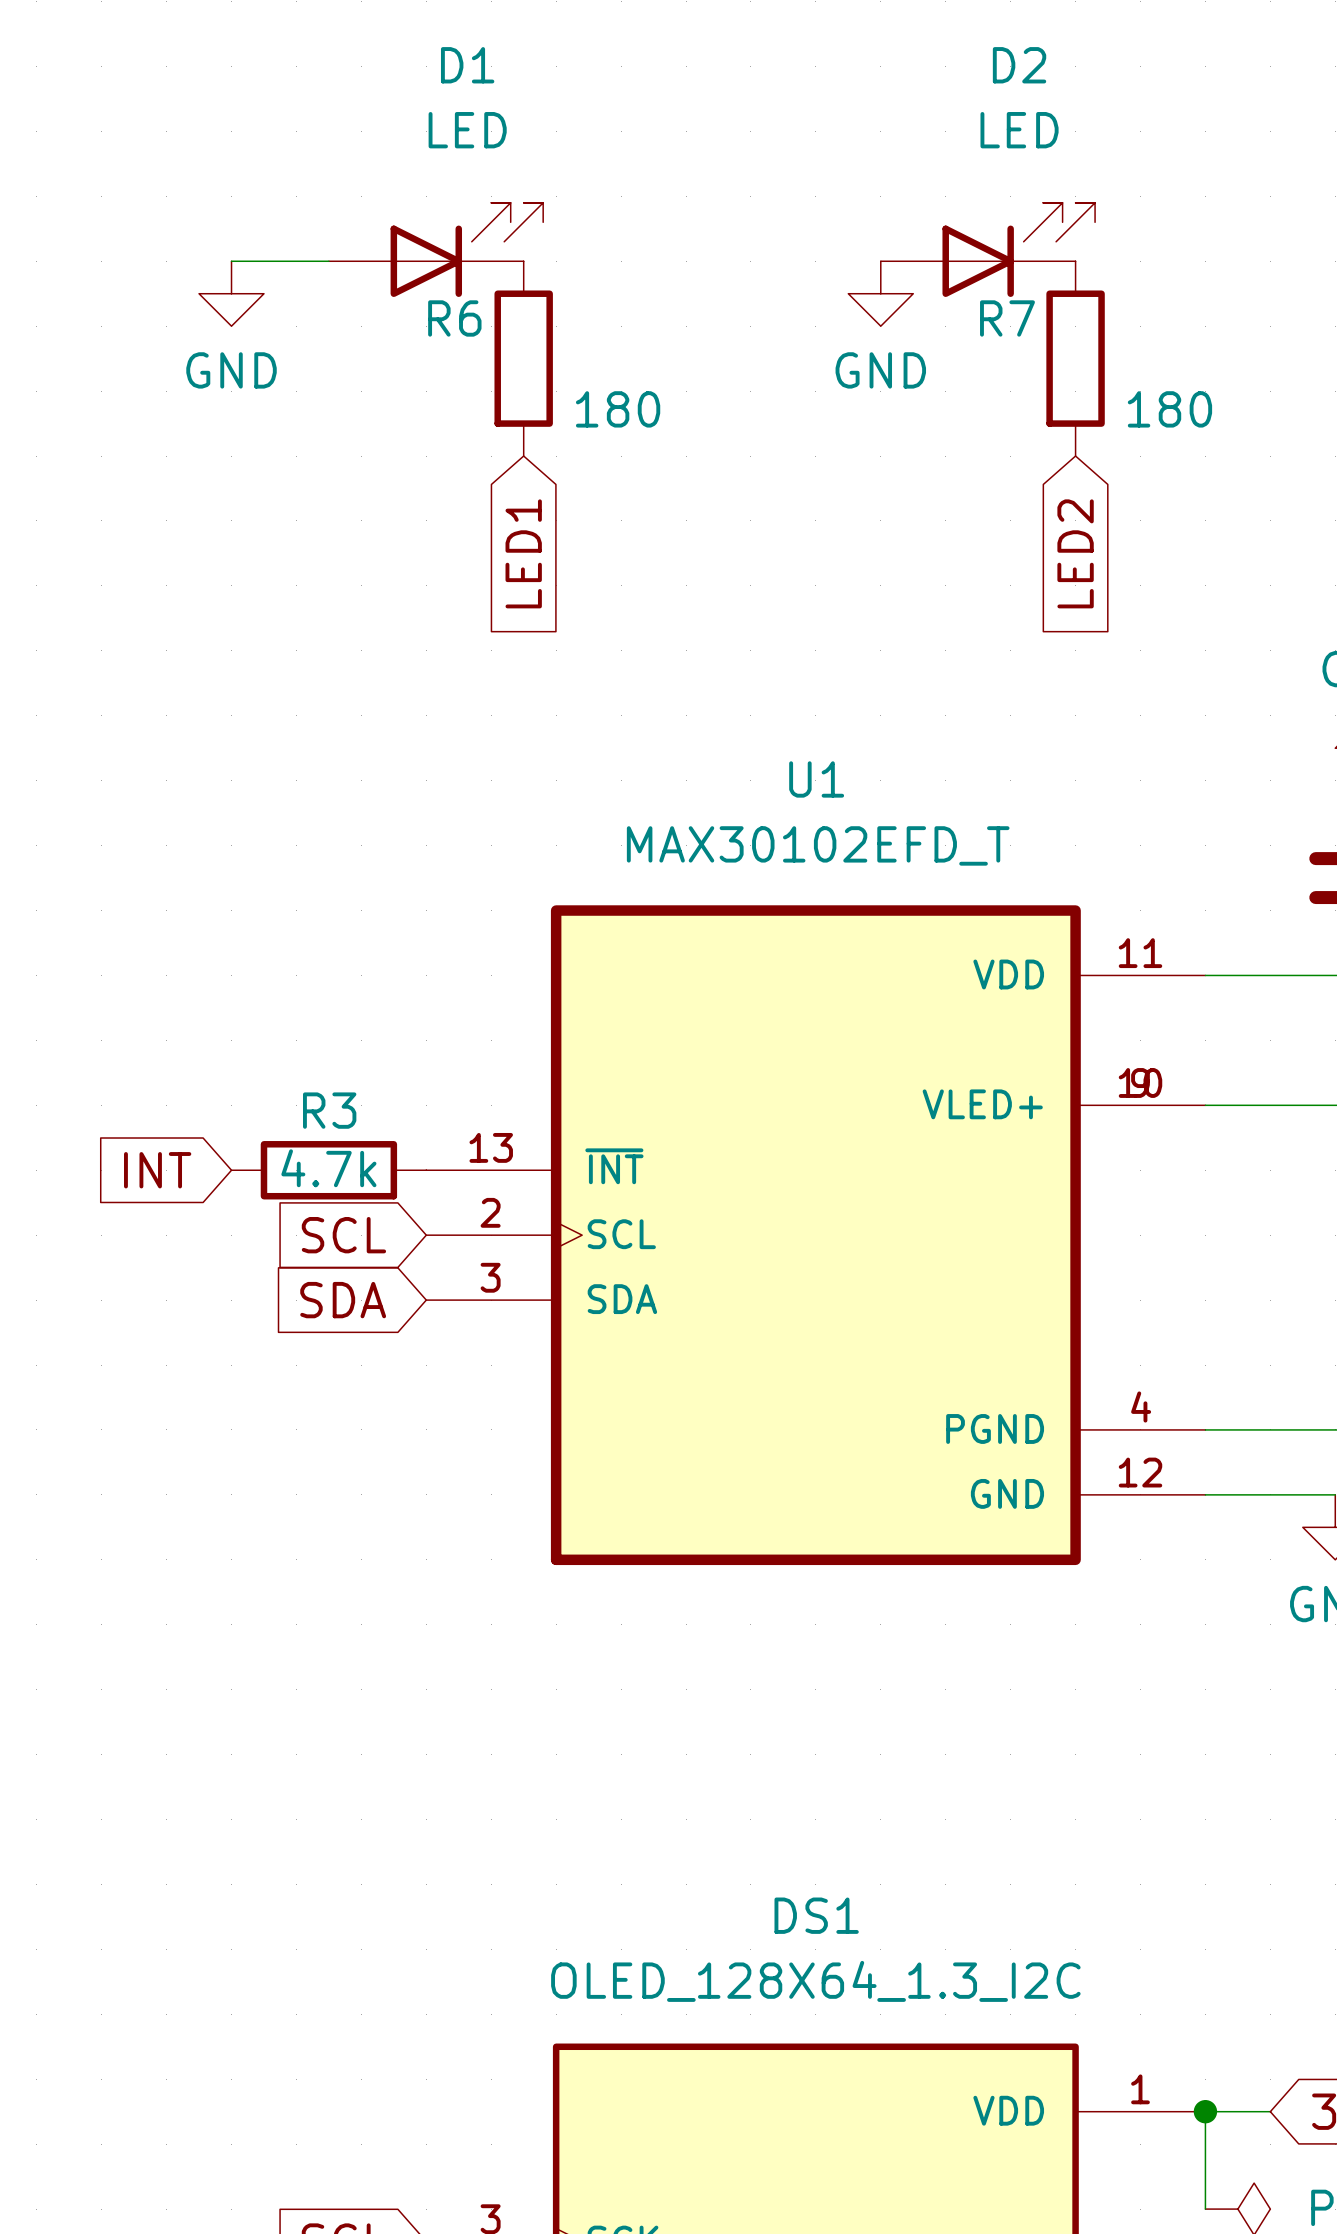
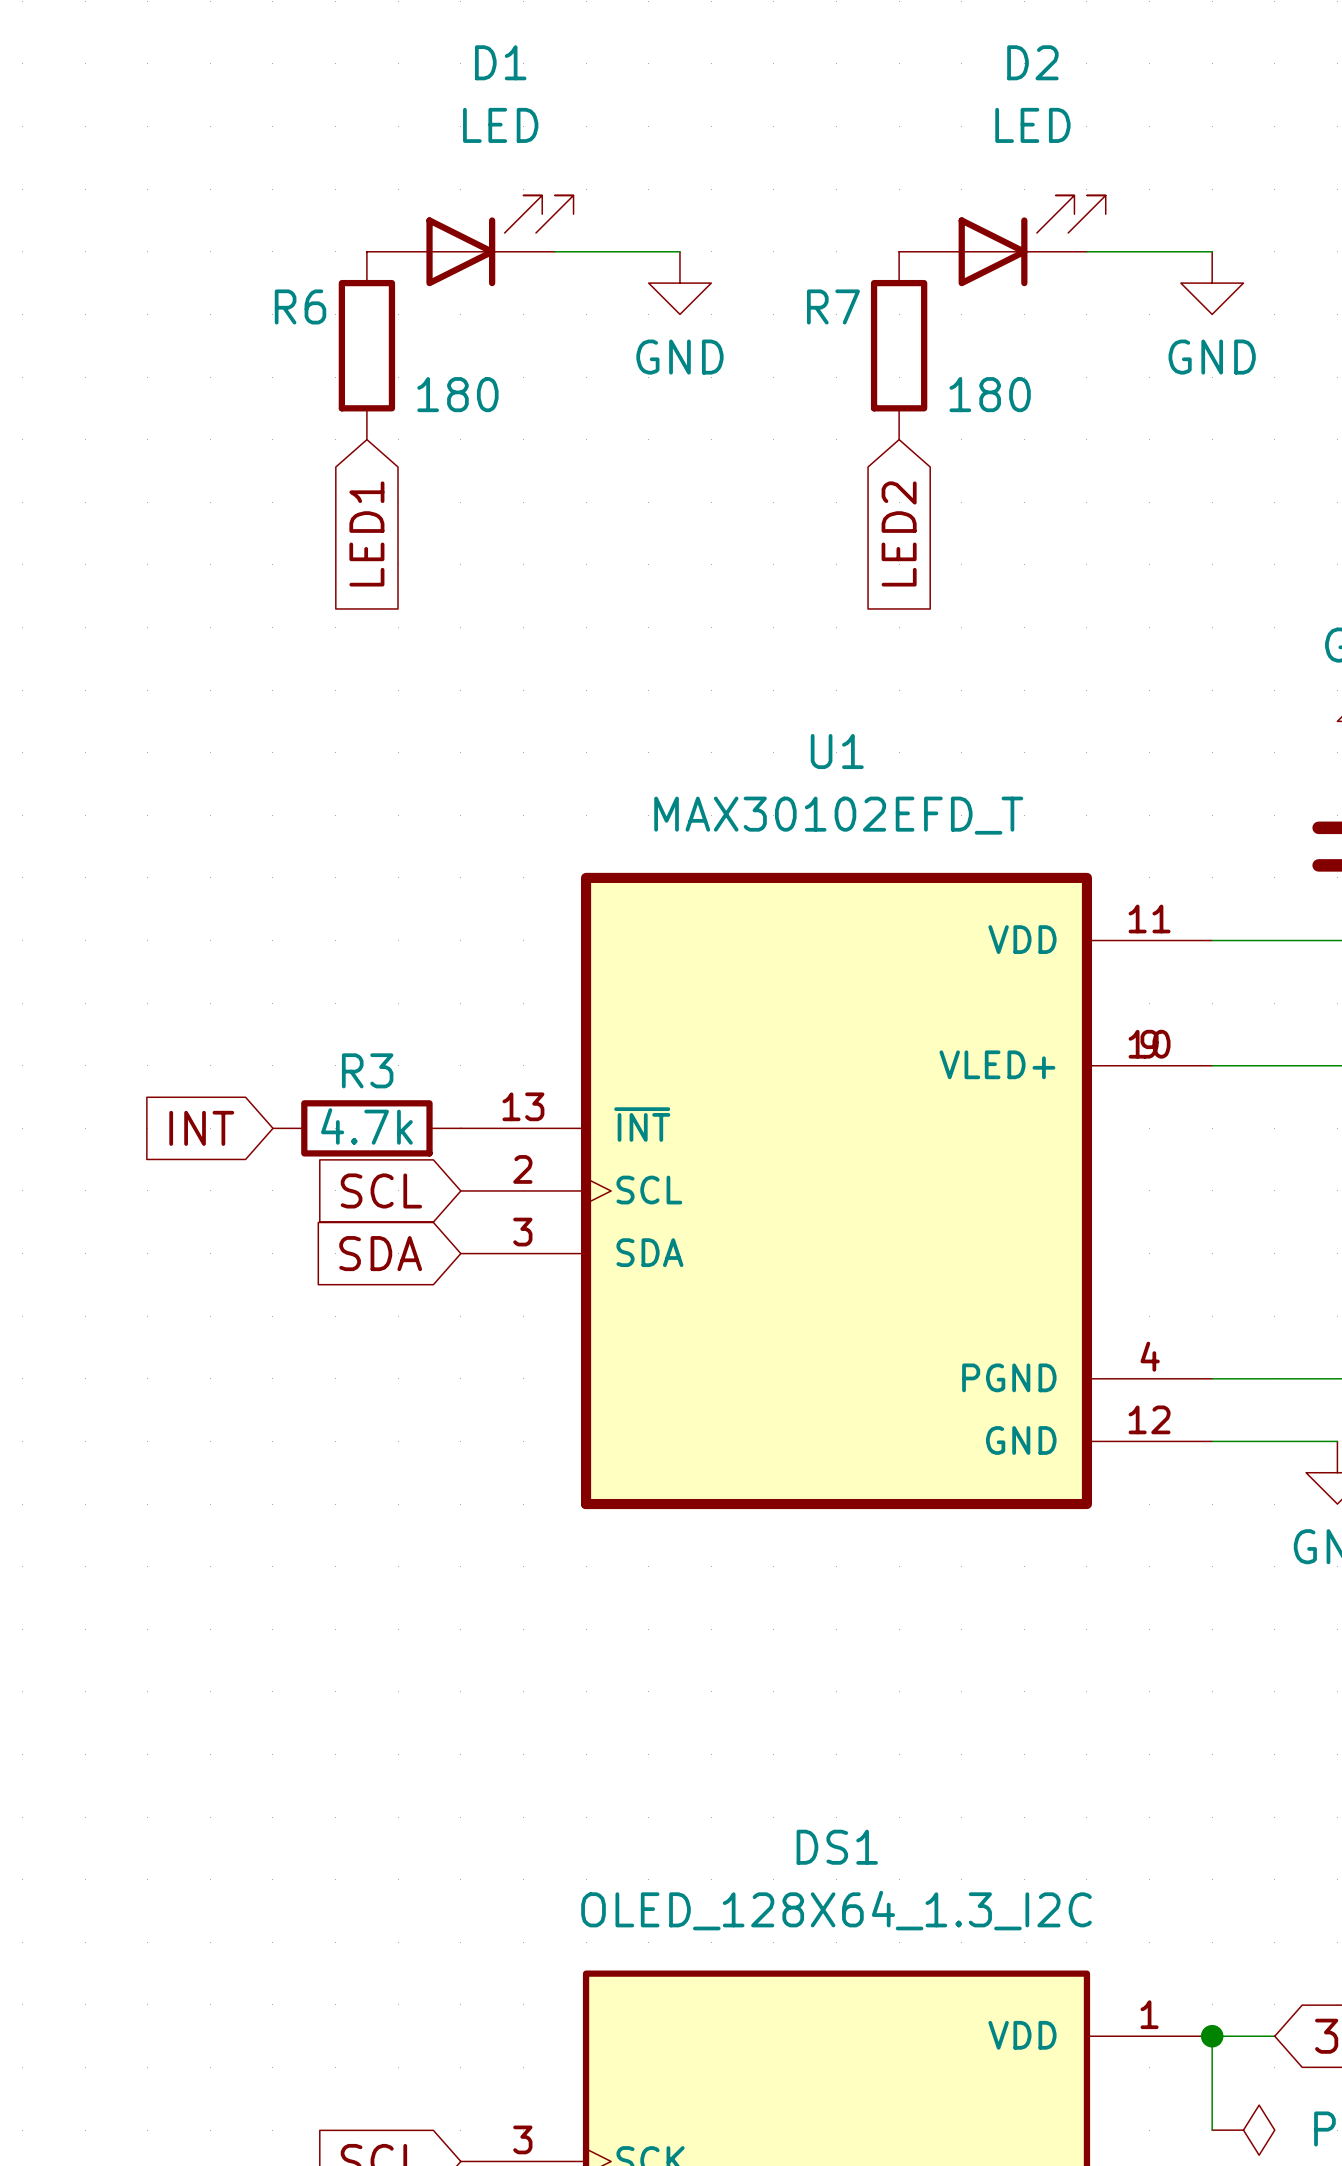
wire: (231, 261) (328, 261) -> none
wire: none -> (554, 251) (679, 251)
wire: none -> (1086, 251) (1212, 251)
power symbol: GND (231, 293) -> none
power symbol: none -> GND (679, 283)
power symbol: GND (880, 293) -> none
power symbol: none -> GND (1212, 283)
R6 position: (523, 358) -> (366, 345)
R7 position: (1075, 358) -> (899, 345)
global label position: LED1 (523, 553) -> LED1 (366, 533)
global label position: LED2 (1075, 553) -> LED2 (899, 533)

